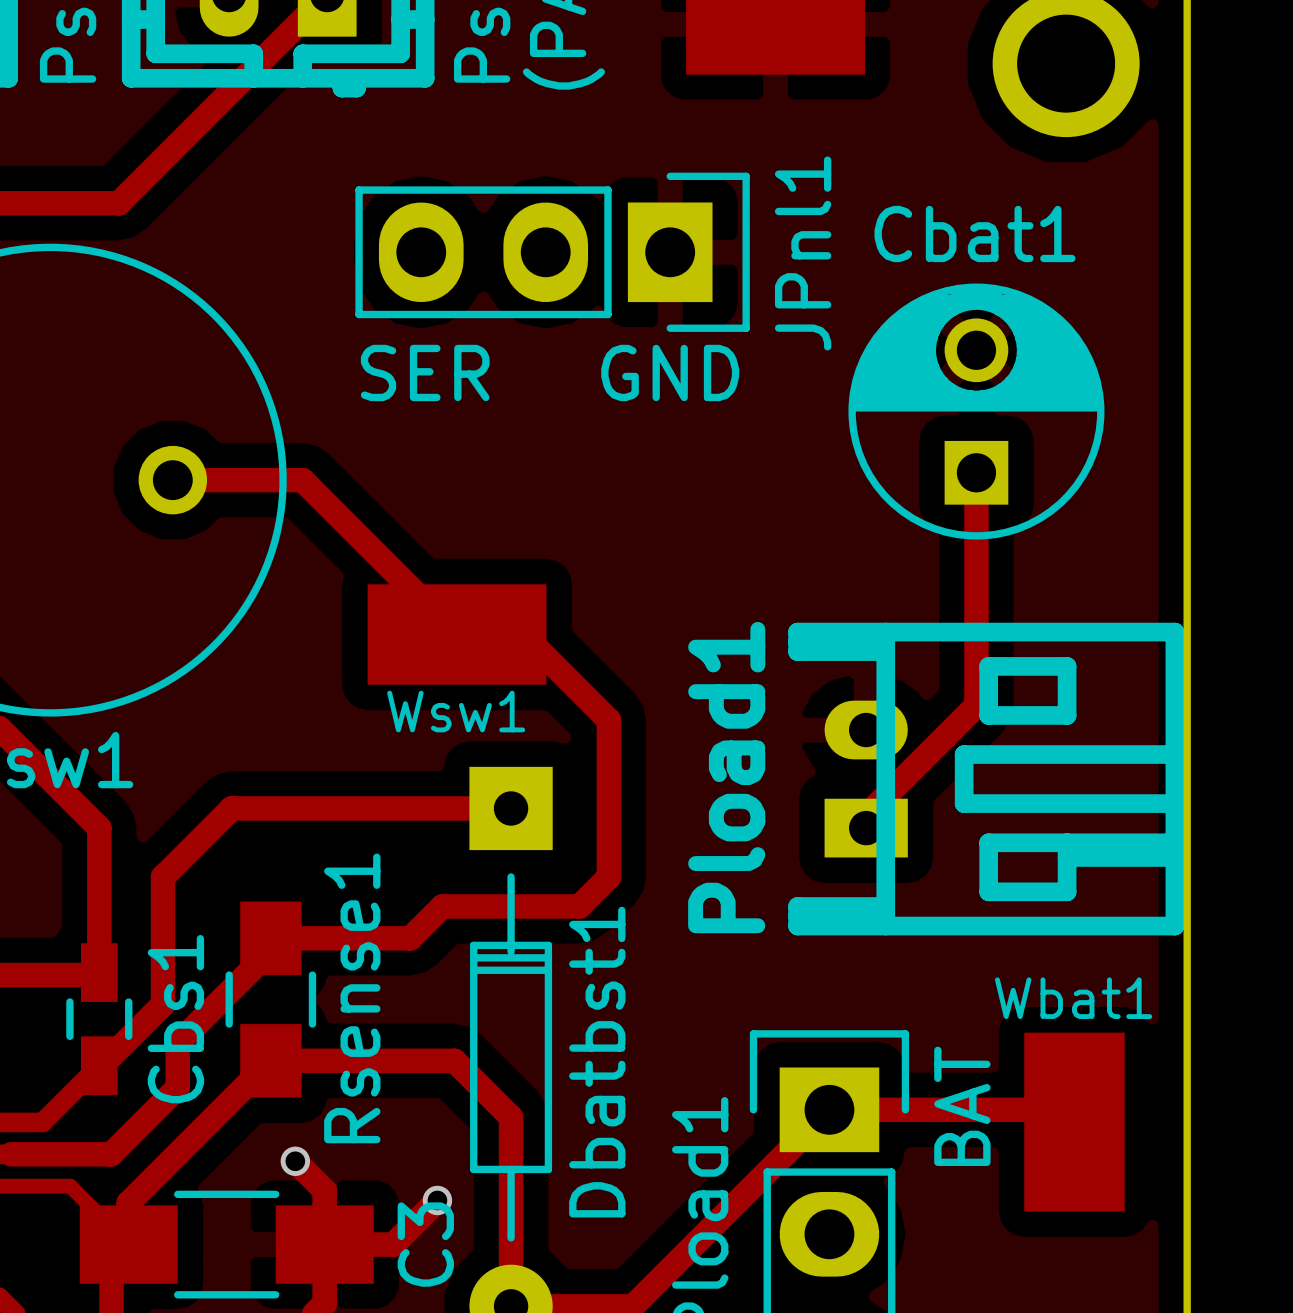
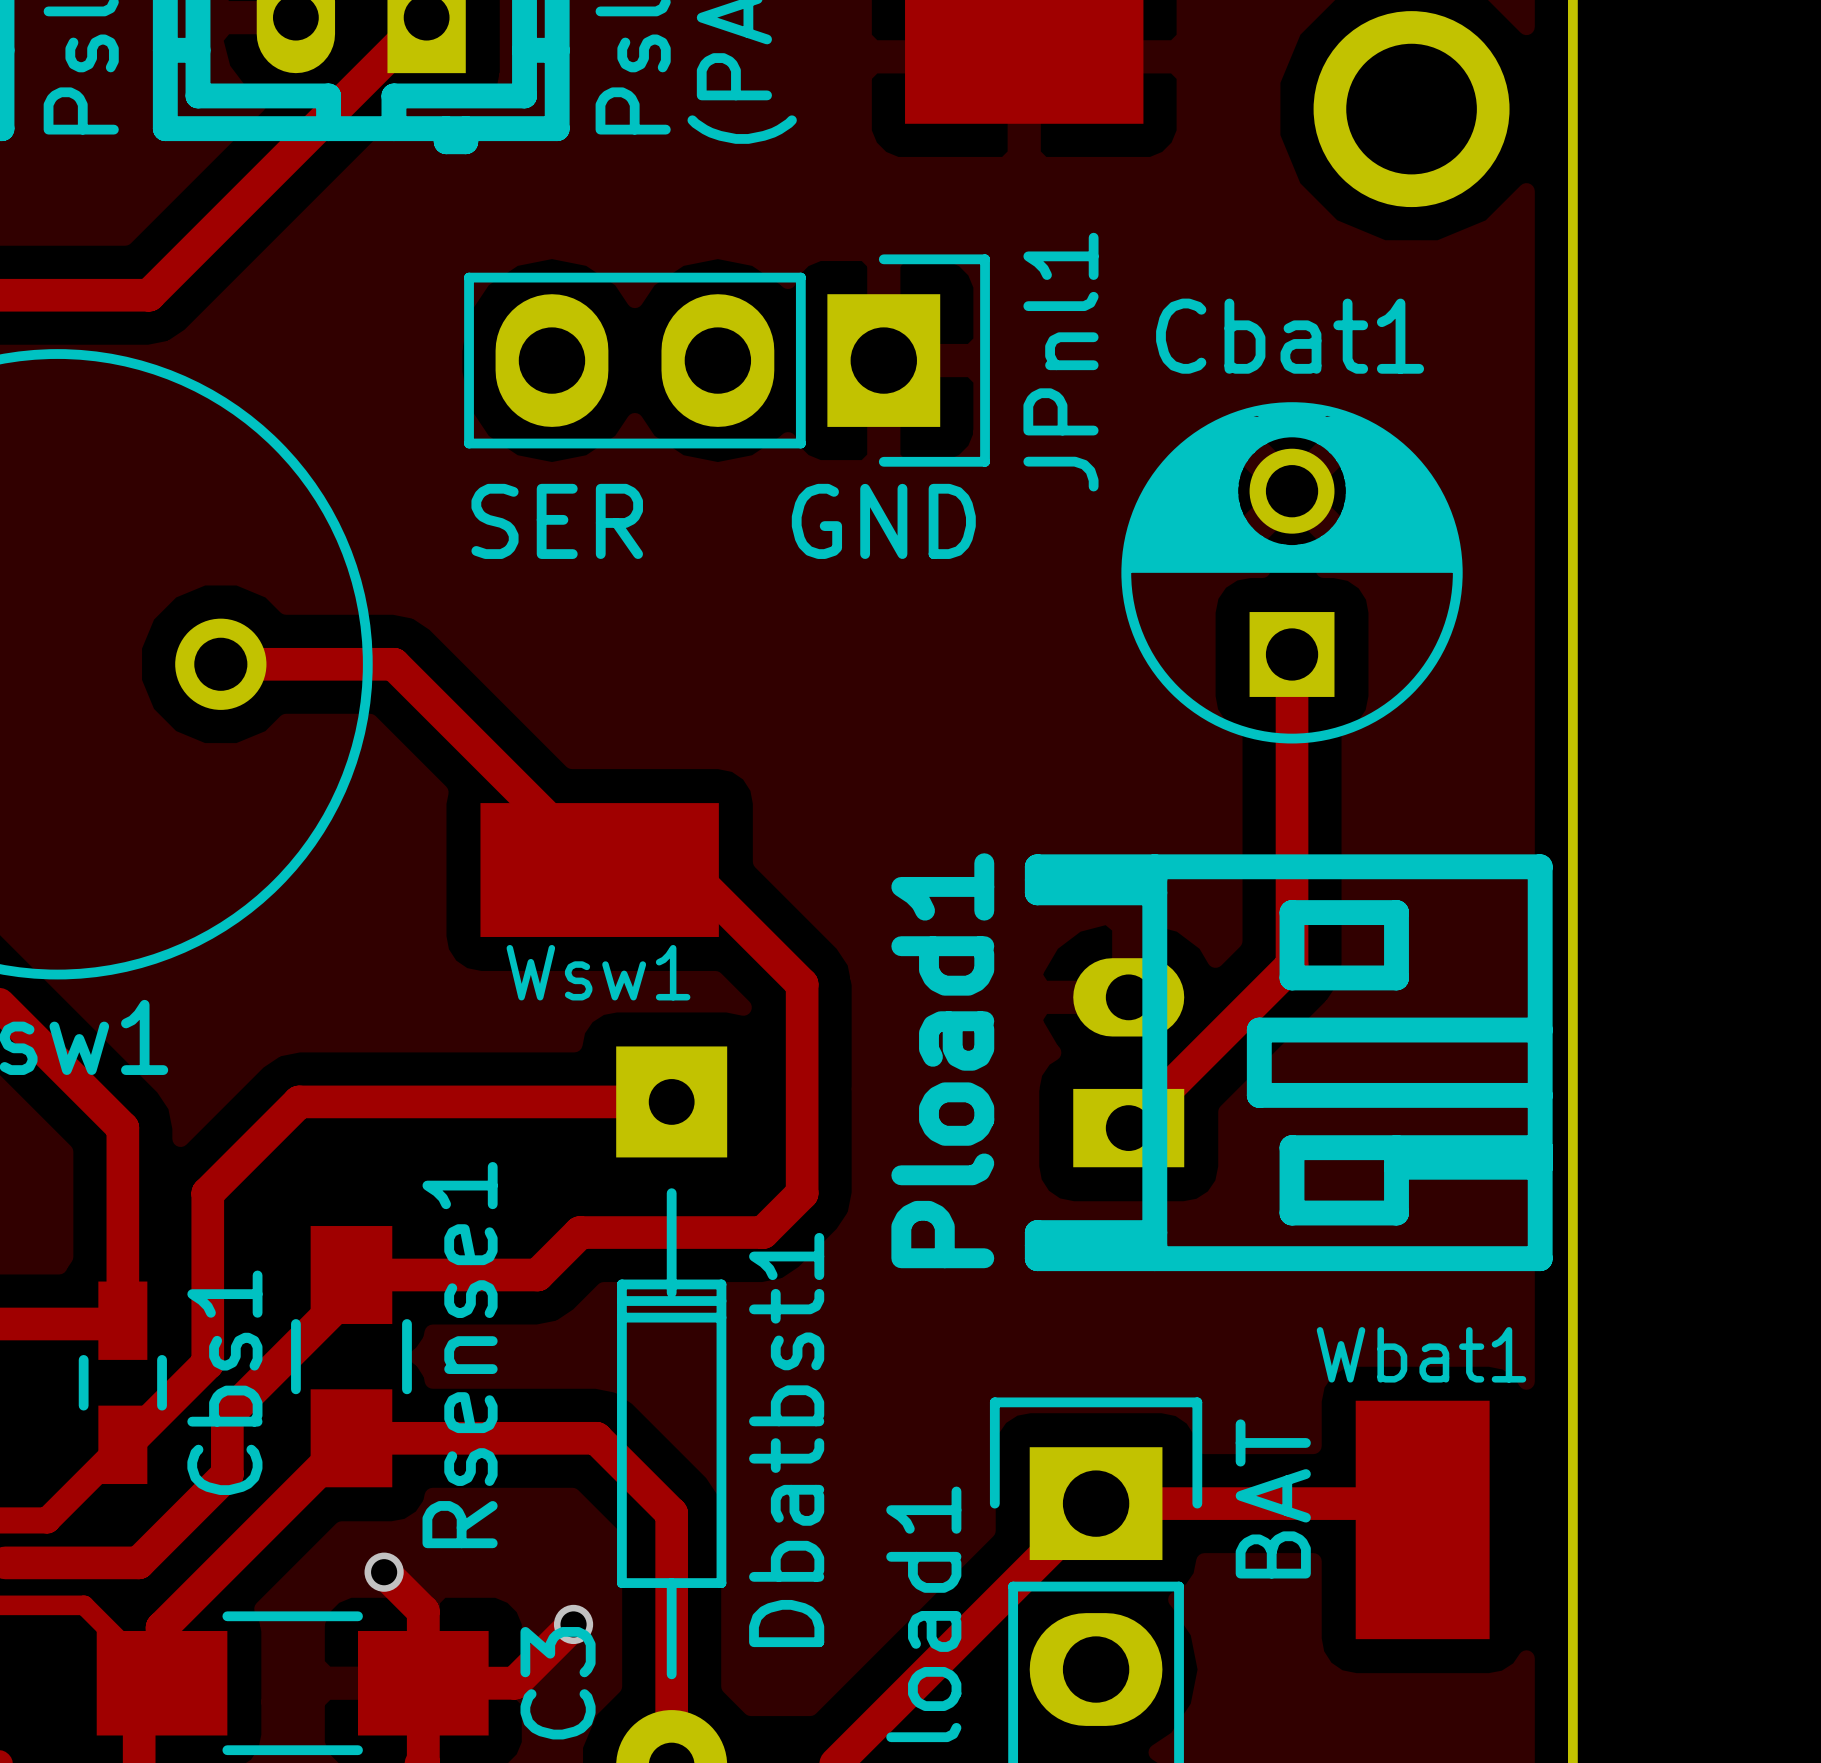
Pload1 position: (986, 779) -> (1288, 1062)

